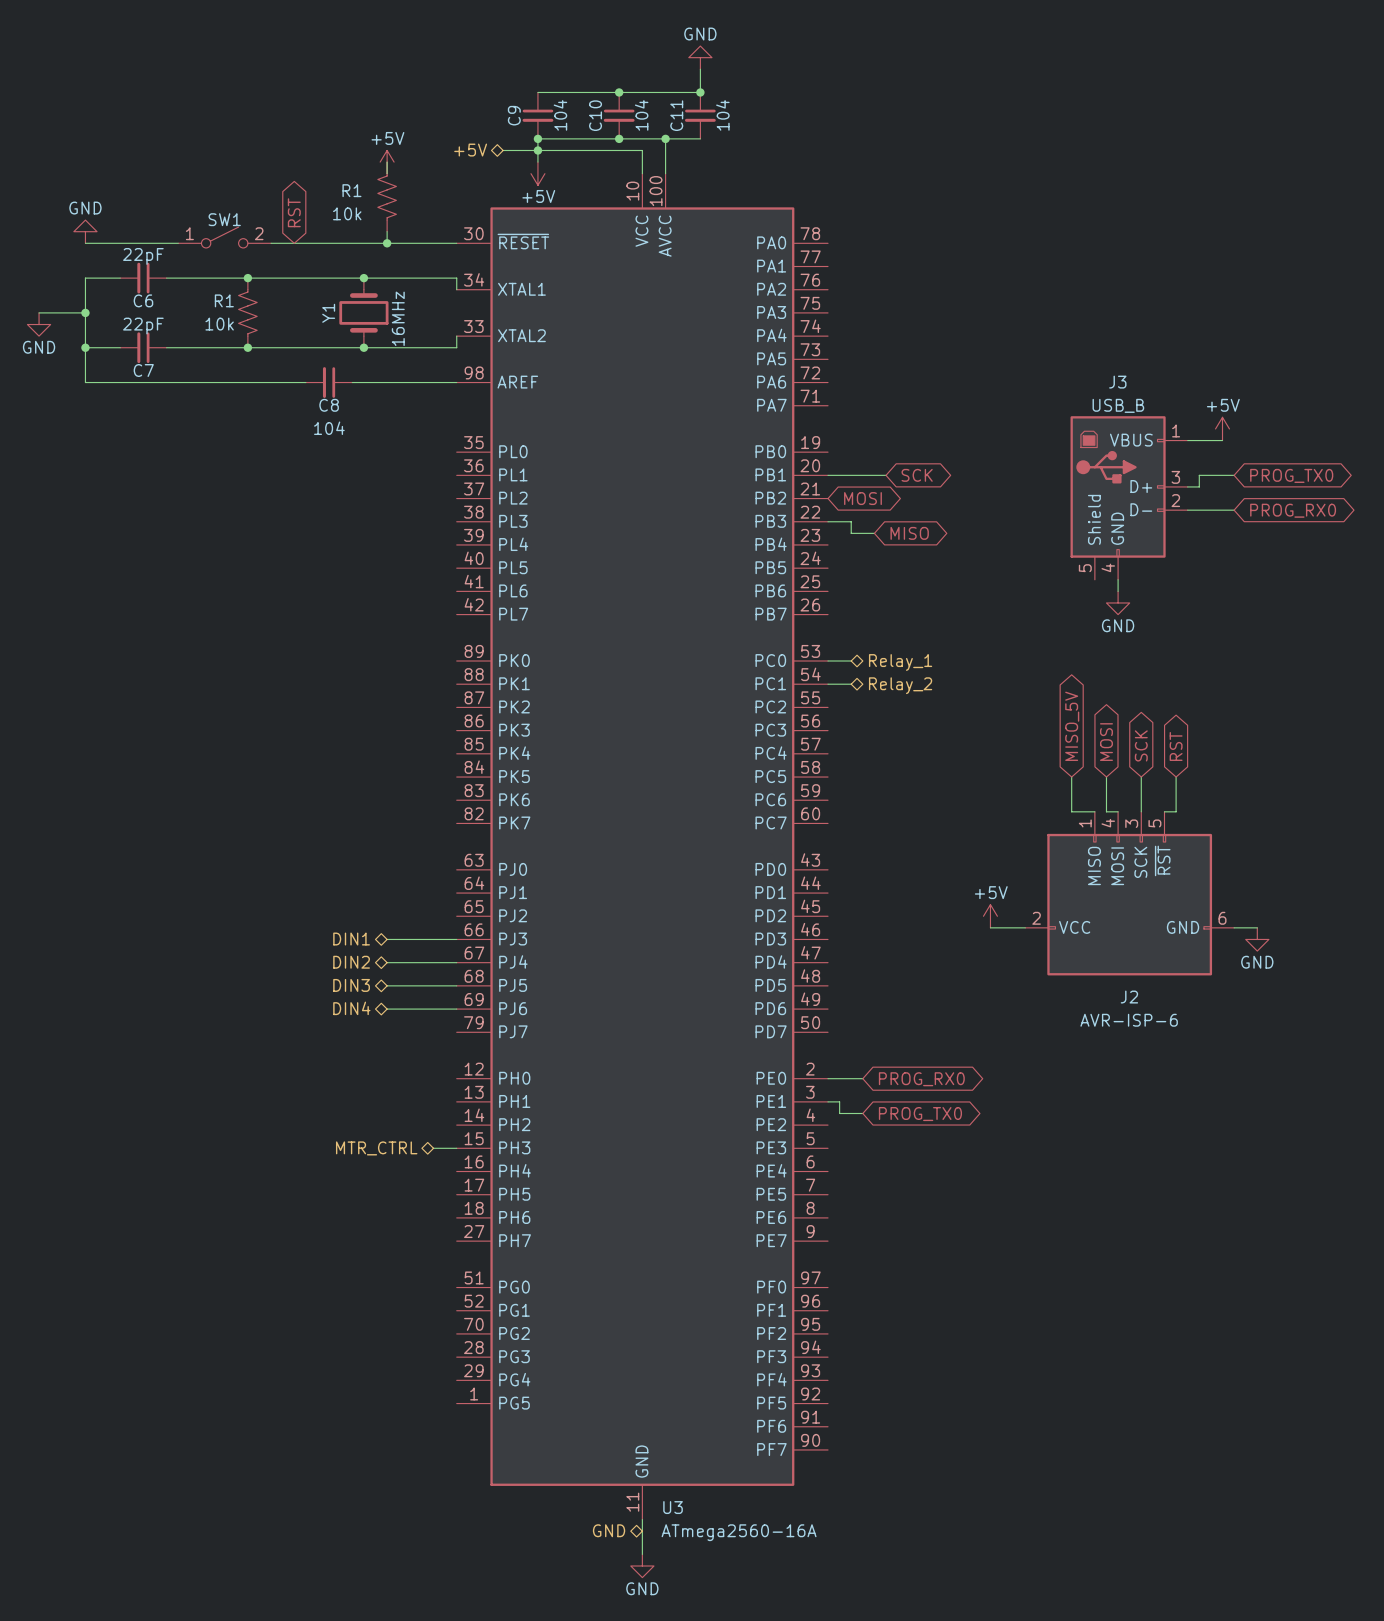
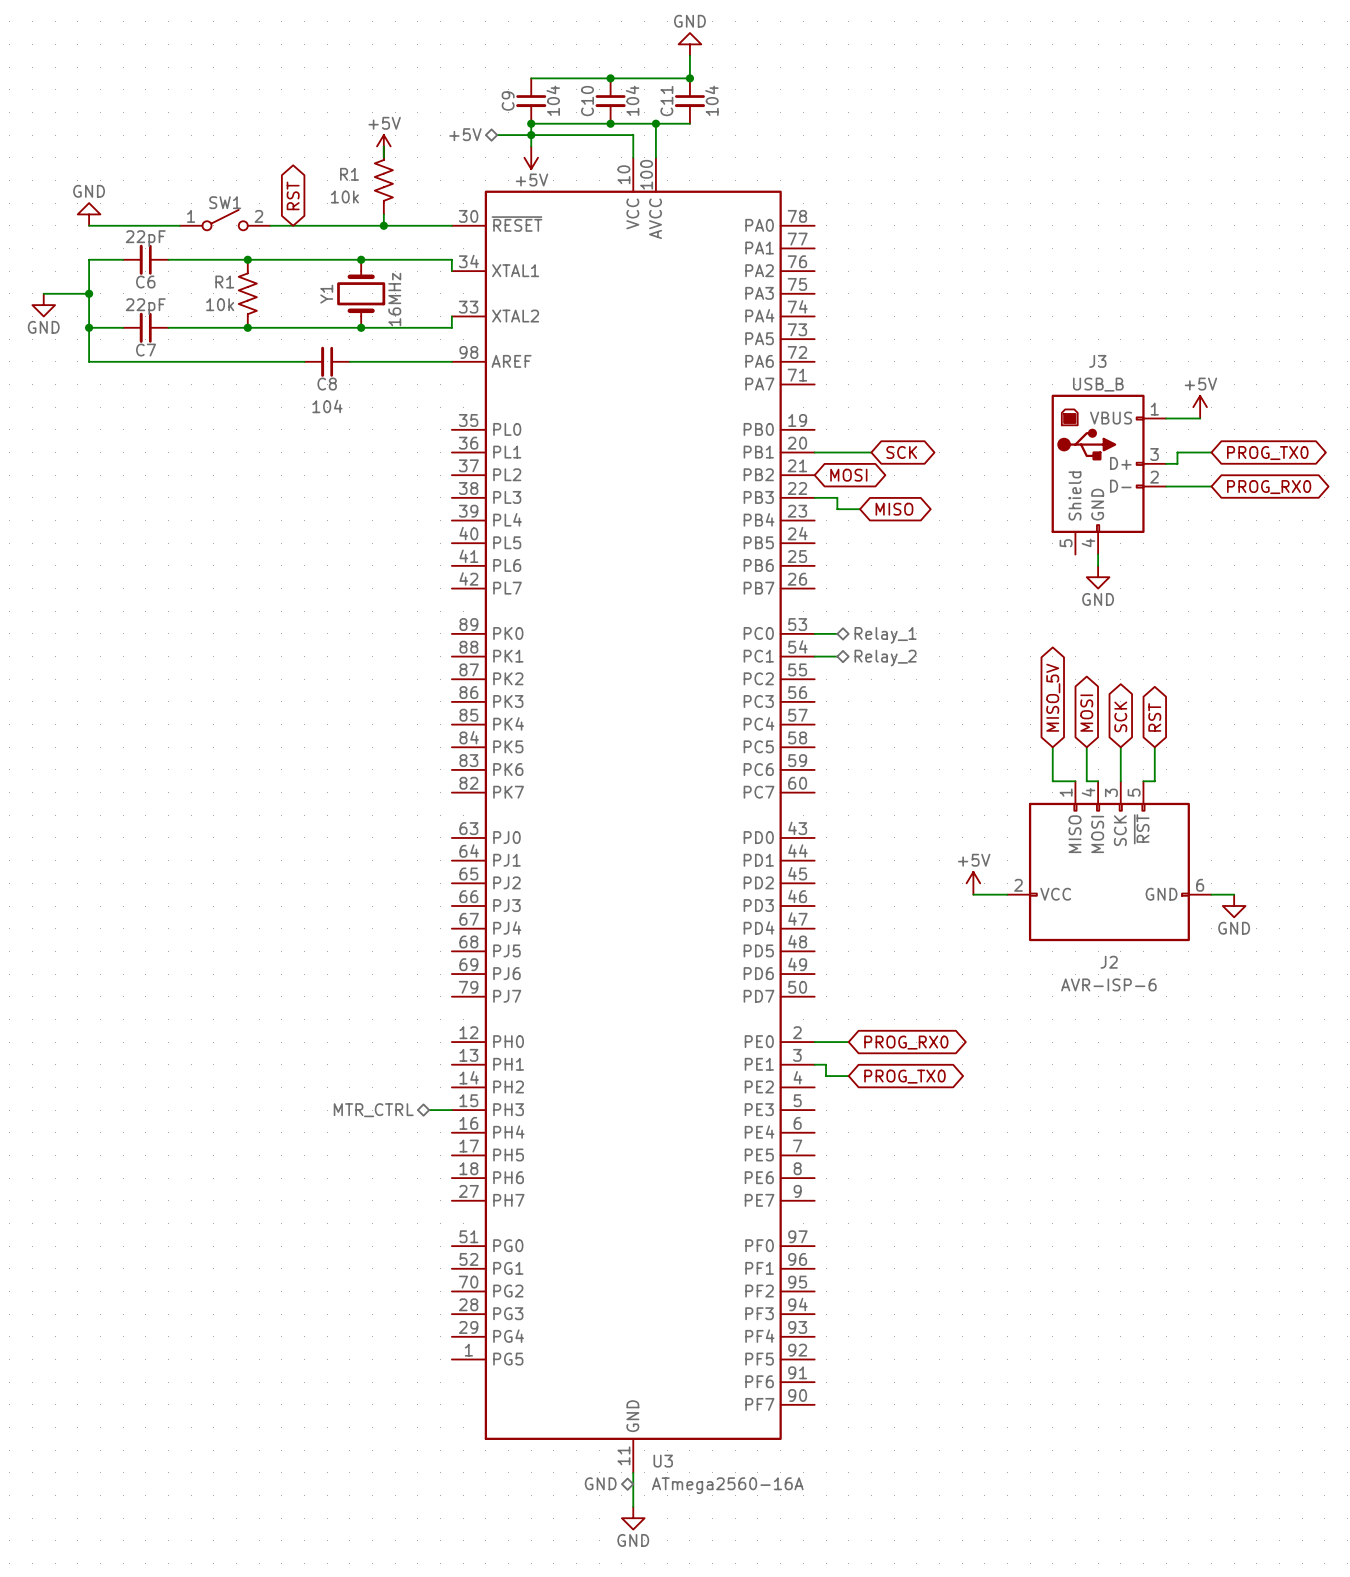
hierarchical label: DIN1 (351, 939) -> none
wire: (387, 939) (456, 939) -> none
hierarchical label: DIN2 (351, 962) -> none
wire: (387, 962) (456, 962) -> none
hierarchical label: DIN3 (351, 985) -> none
wire: (387, 985) (456, 985) -> none
hierarchical label: DIN4 (351, 1008) -> none
wire: (387, 1009) (456, 1009) -> none

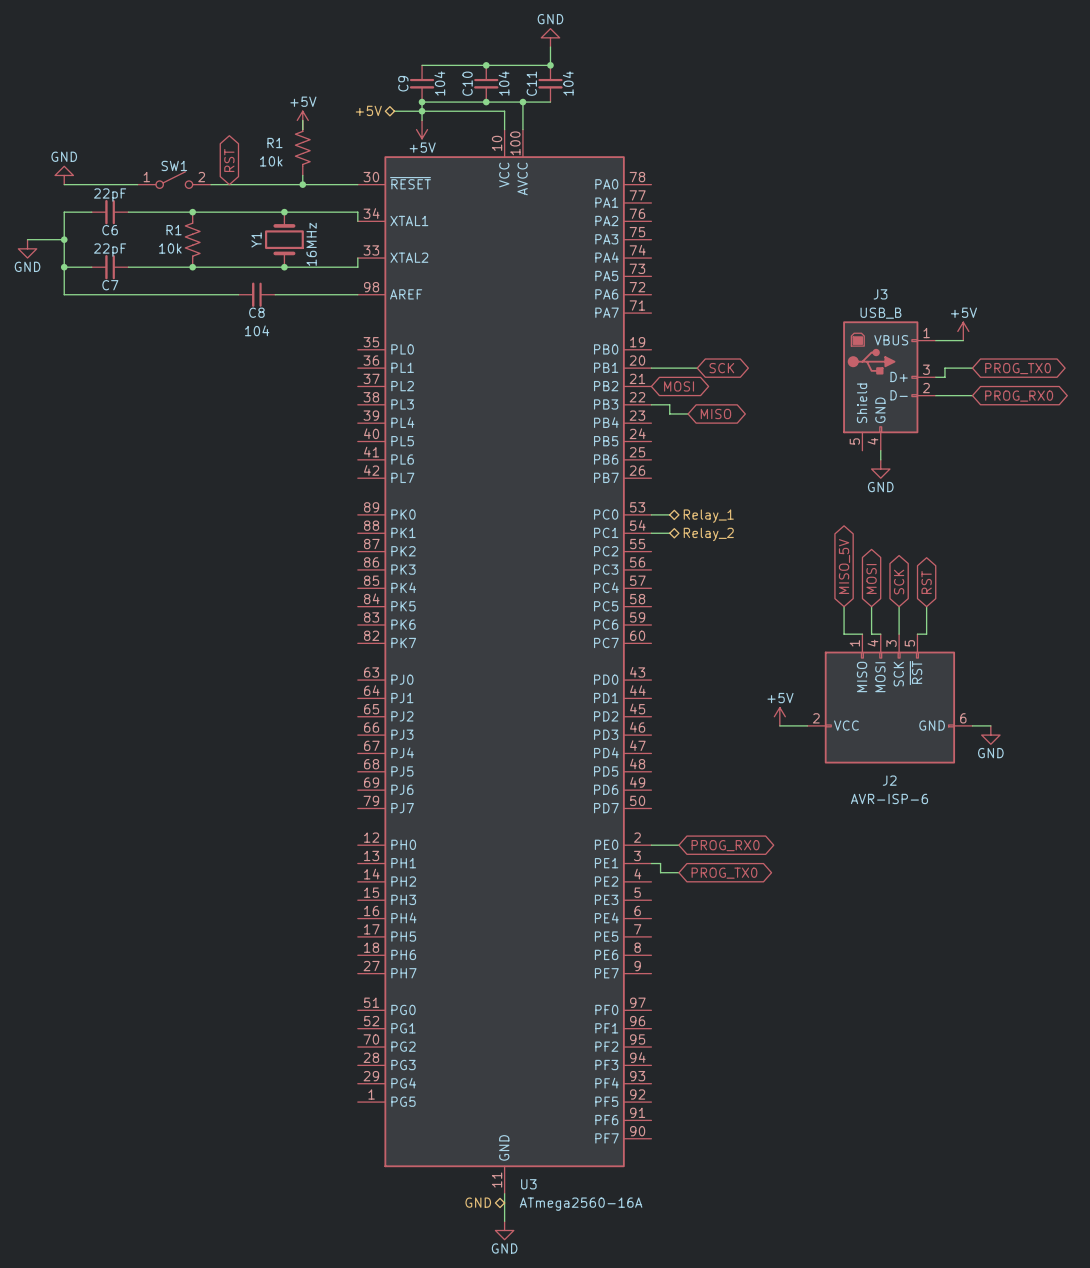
hierarchical label: MTR_CTRL (373, 1110) -> none
wire: (429, 1110) (451, 1110) -> none

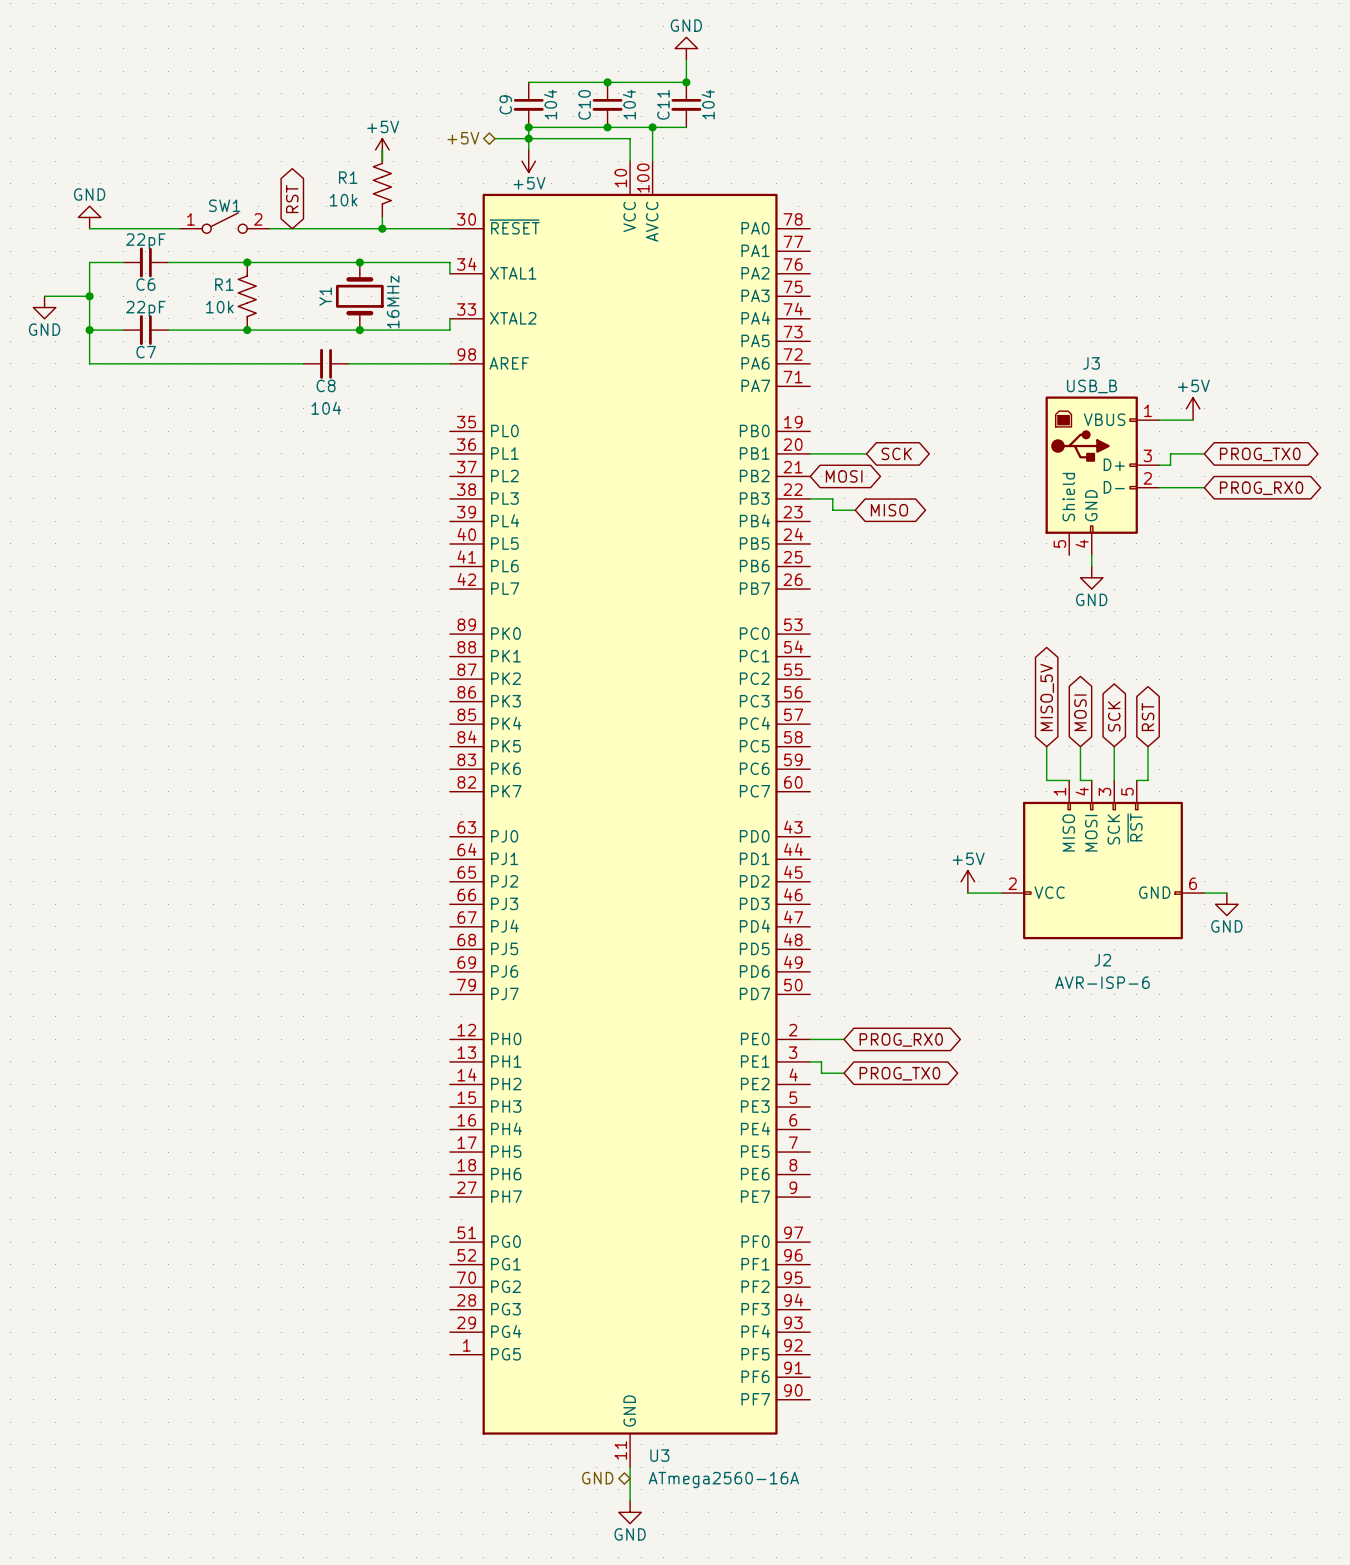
wire: (651, 514) (669, 514) -> none
hierarchical label: Relay_1 (708, 516) -> none
wire: (651, 533) (669, 533) -> none
hierarchical label: Relay_2 (708, 534) -> none

